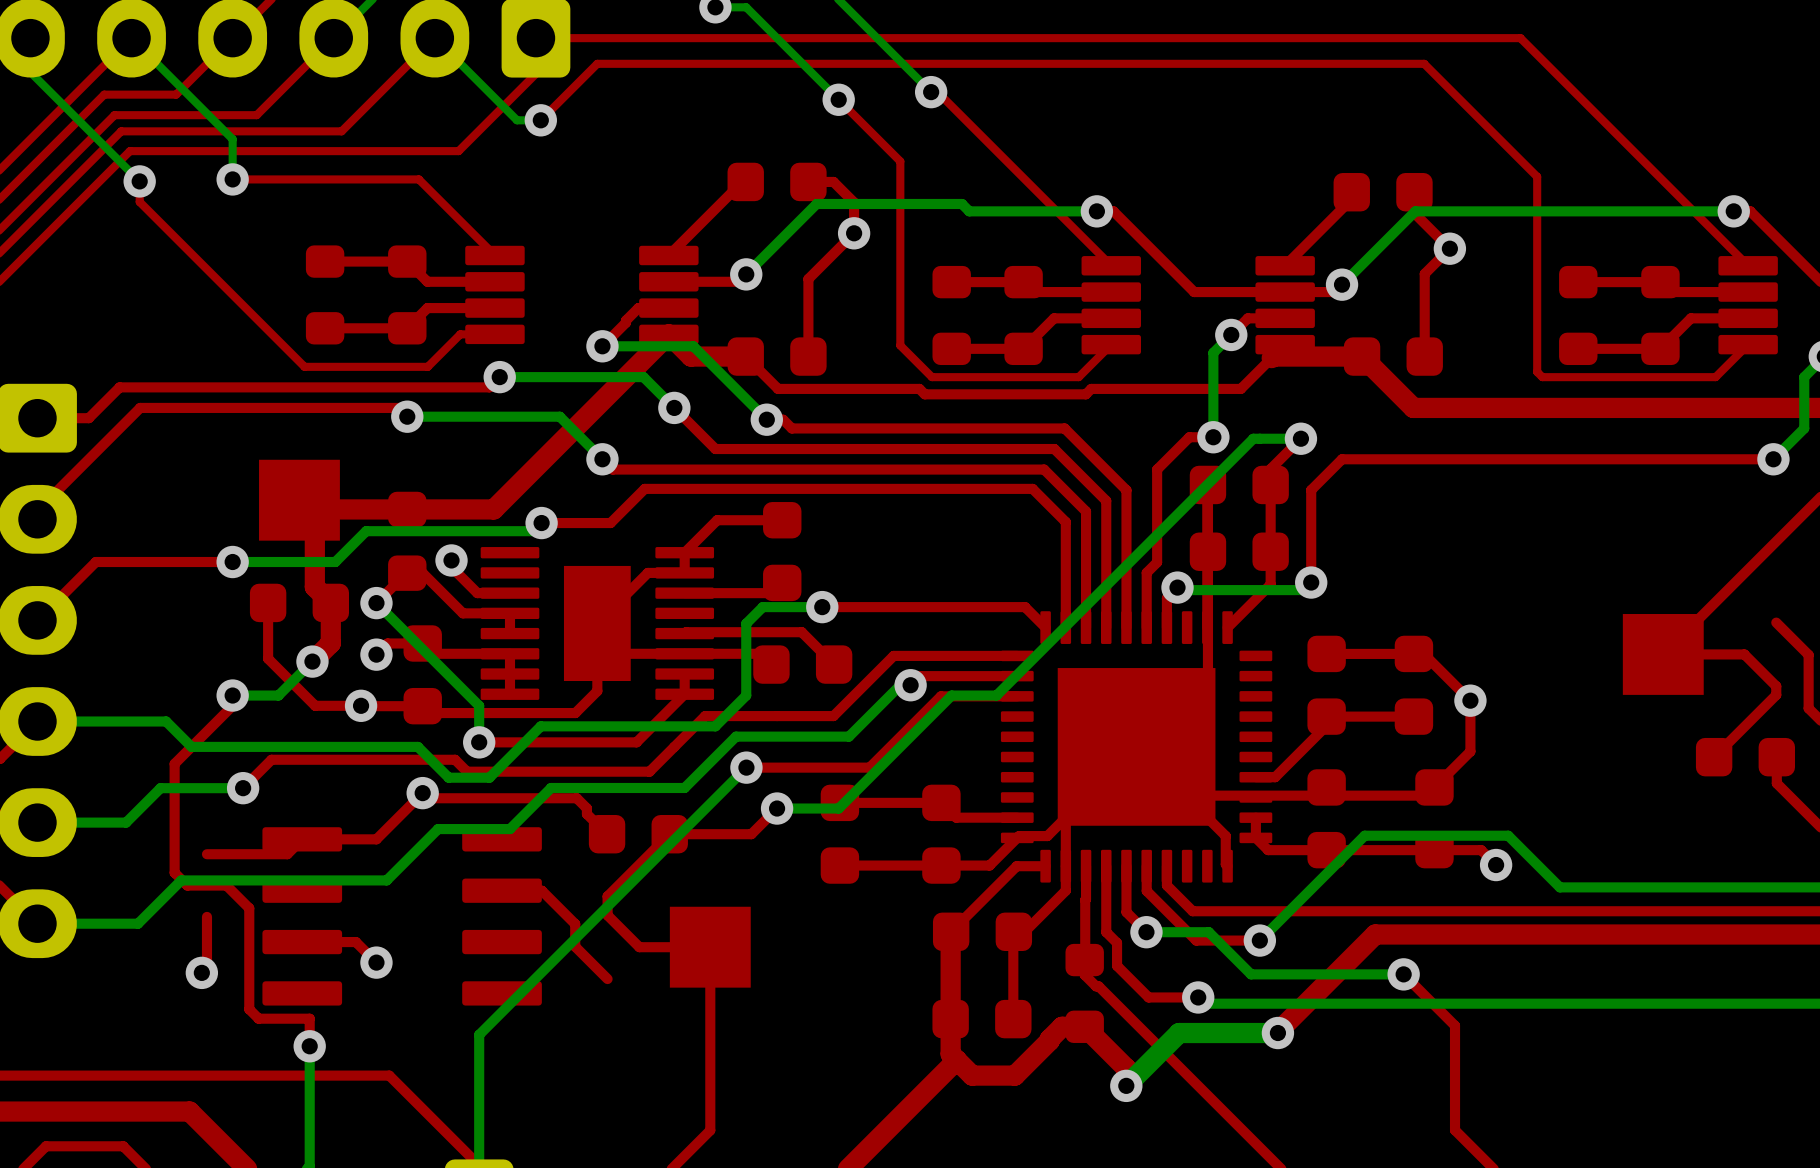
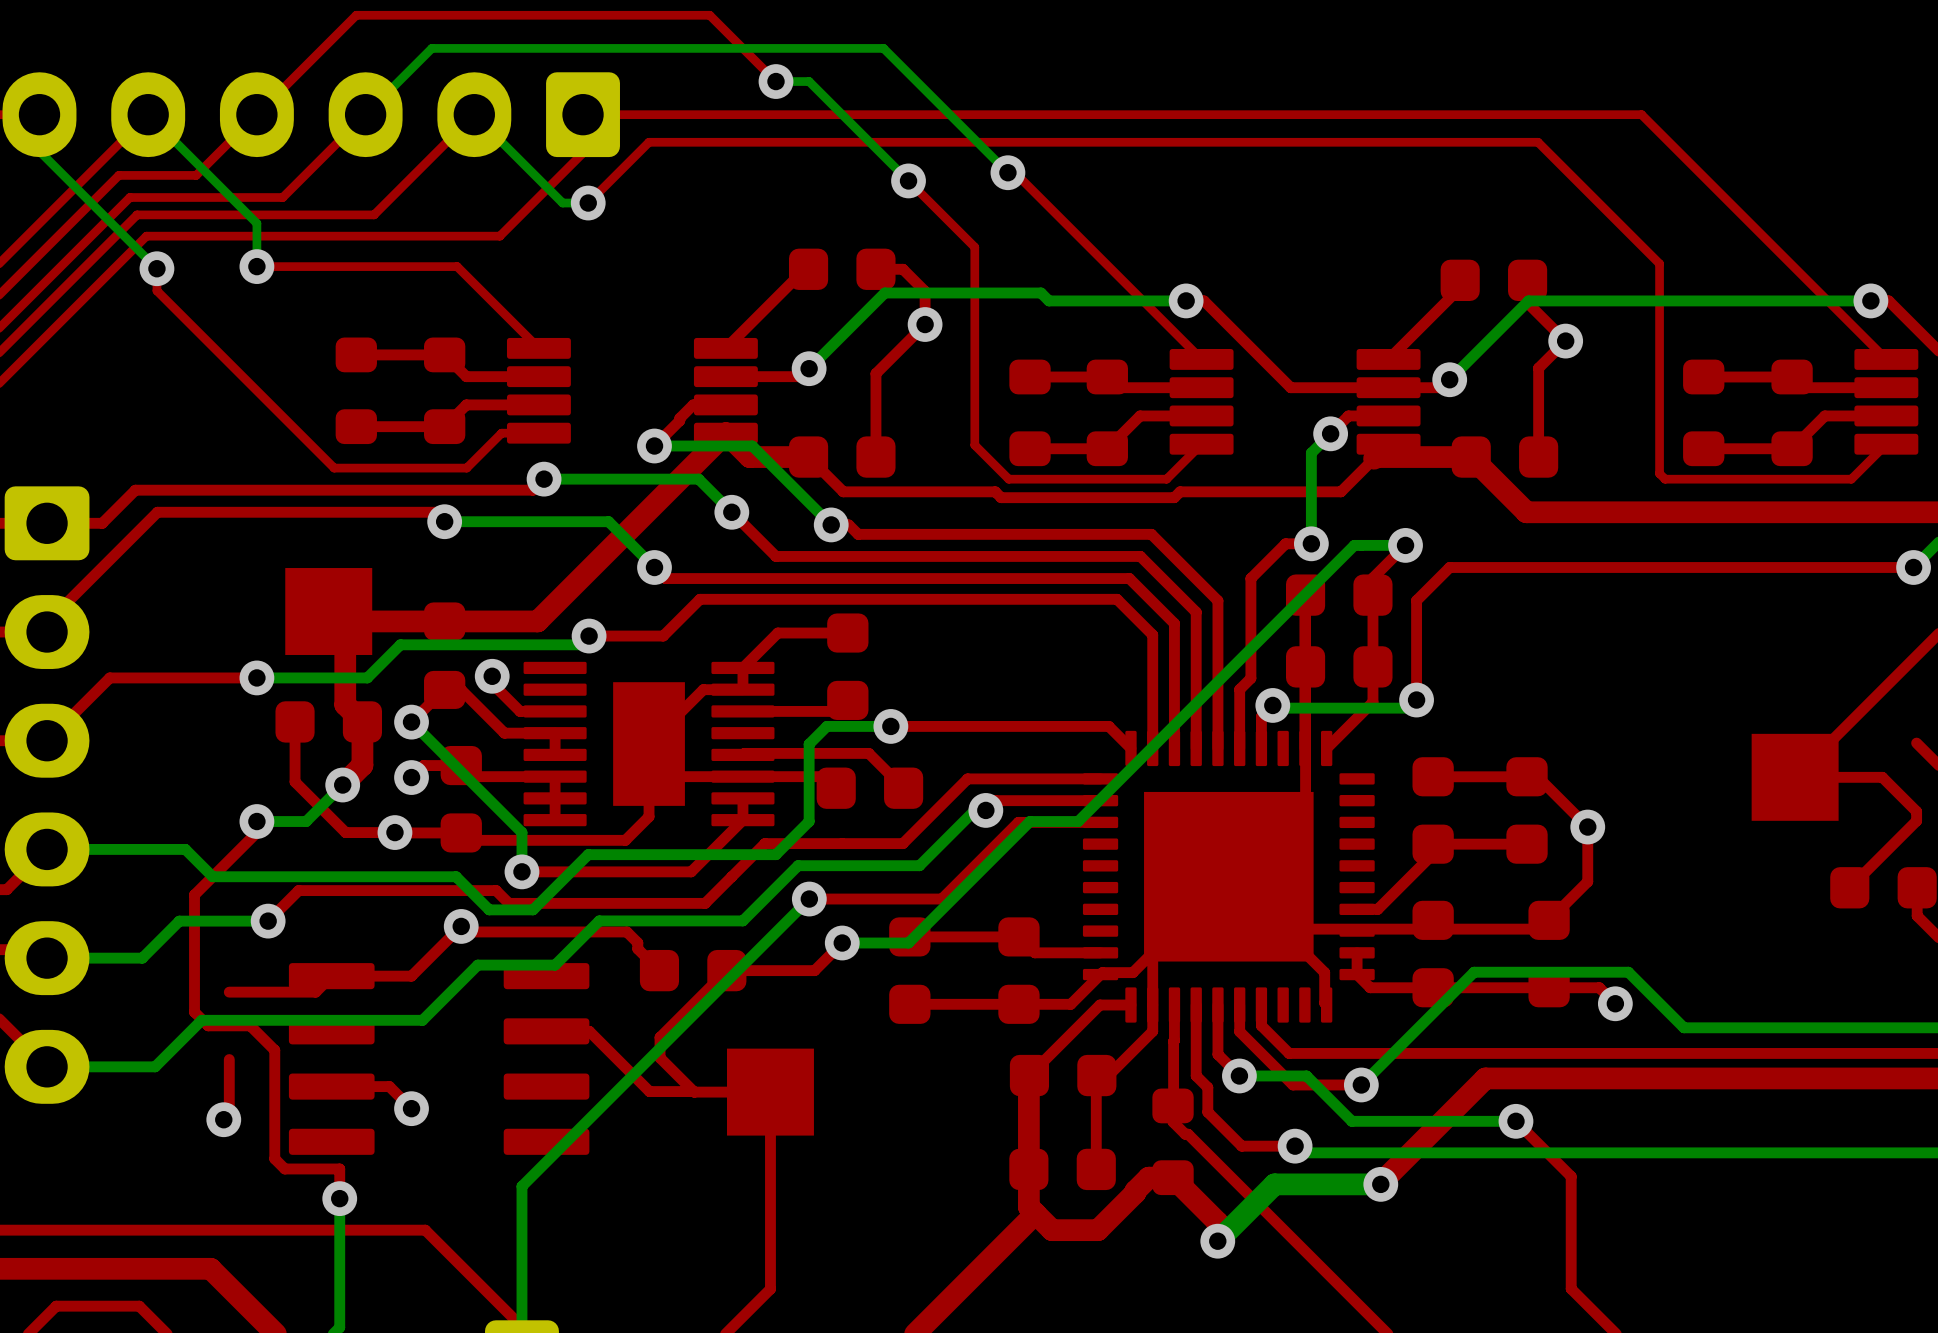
top track: (575, 924) (575, 946) (607, 979) -> (625, 1067) (649, 1091) (693, 1091)

